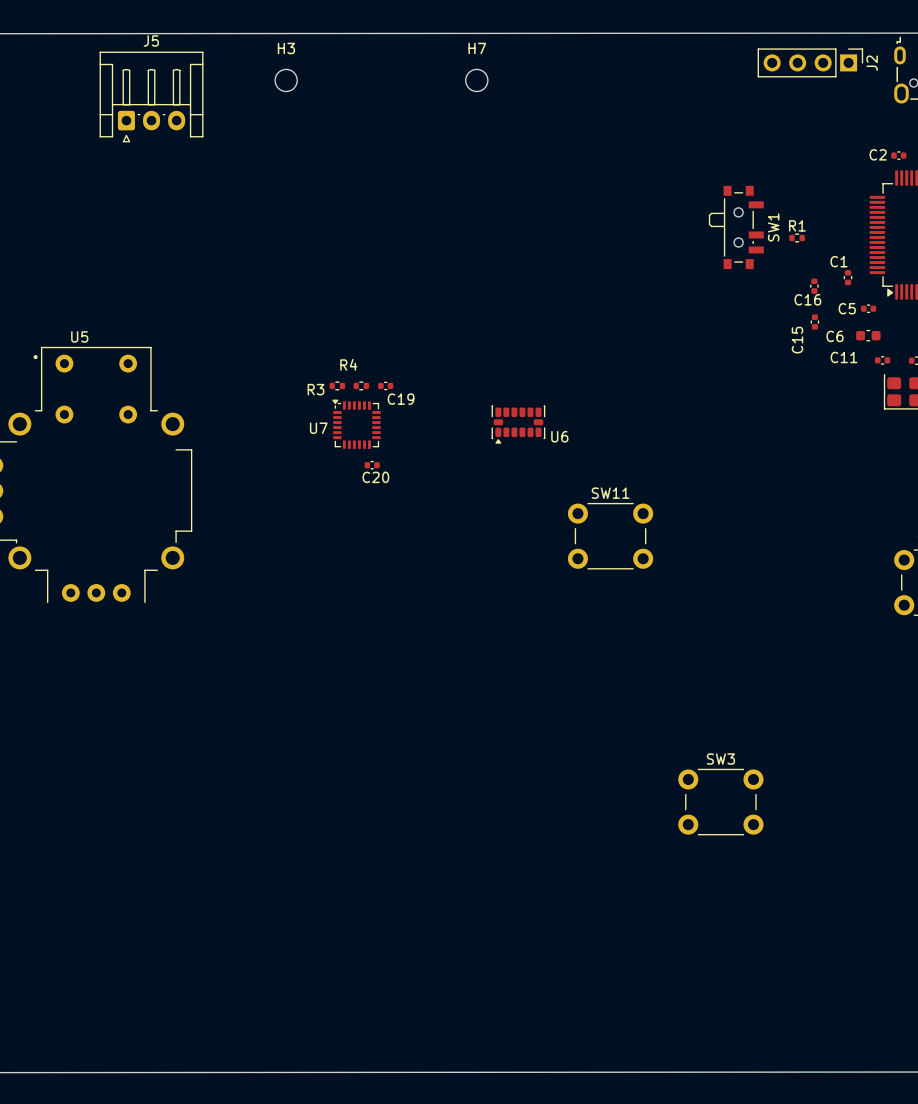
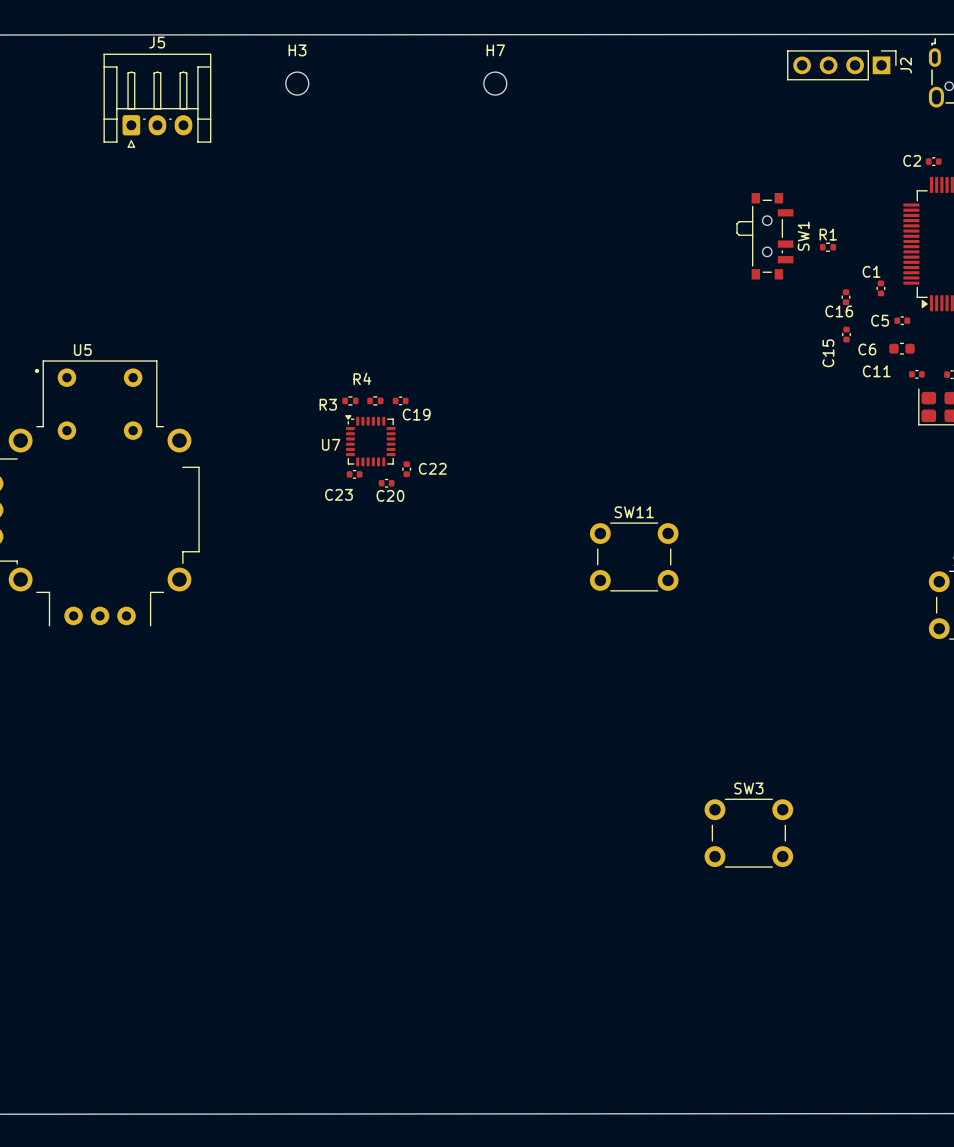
U6: (518, 424) -> none
C22: none -> (406, 469)
C23: none -> (354, 474)

